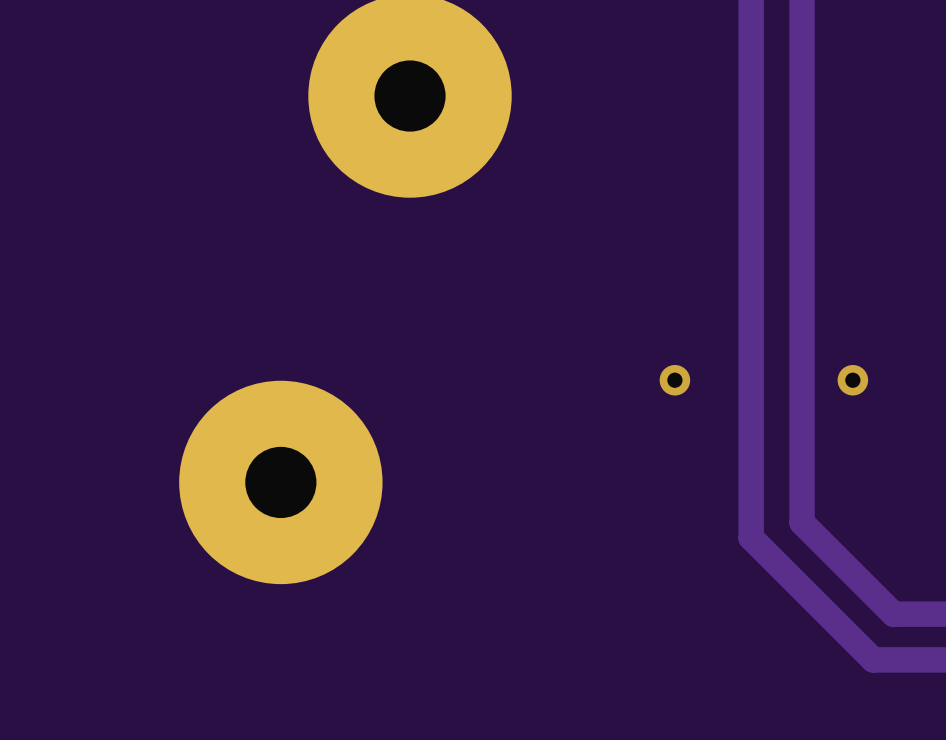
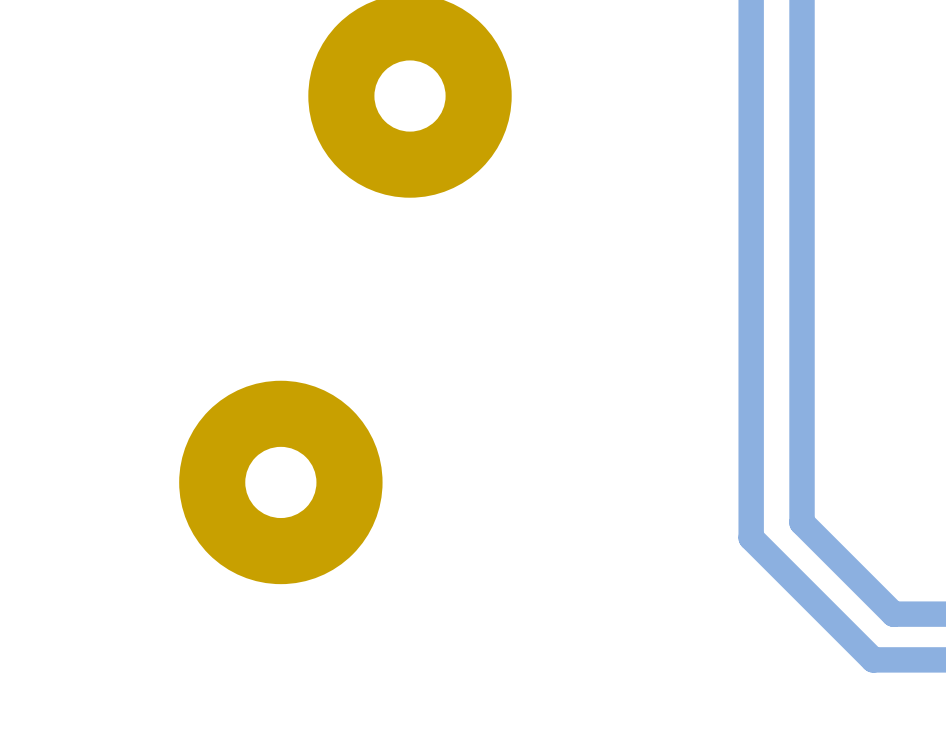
via: (674, 380) -> none
via: (852, 380) -> none

